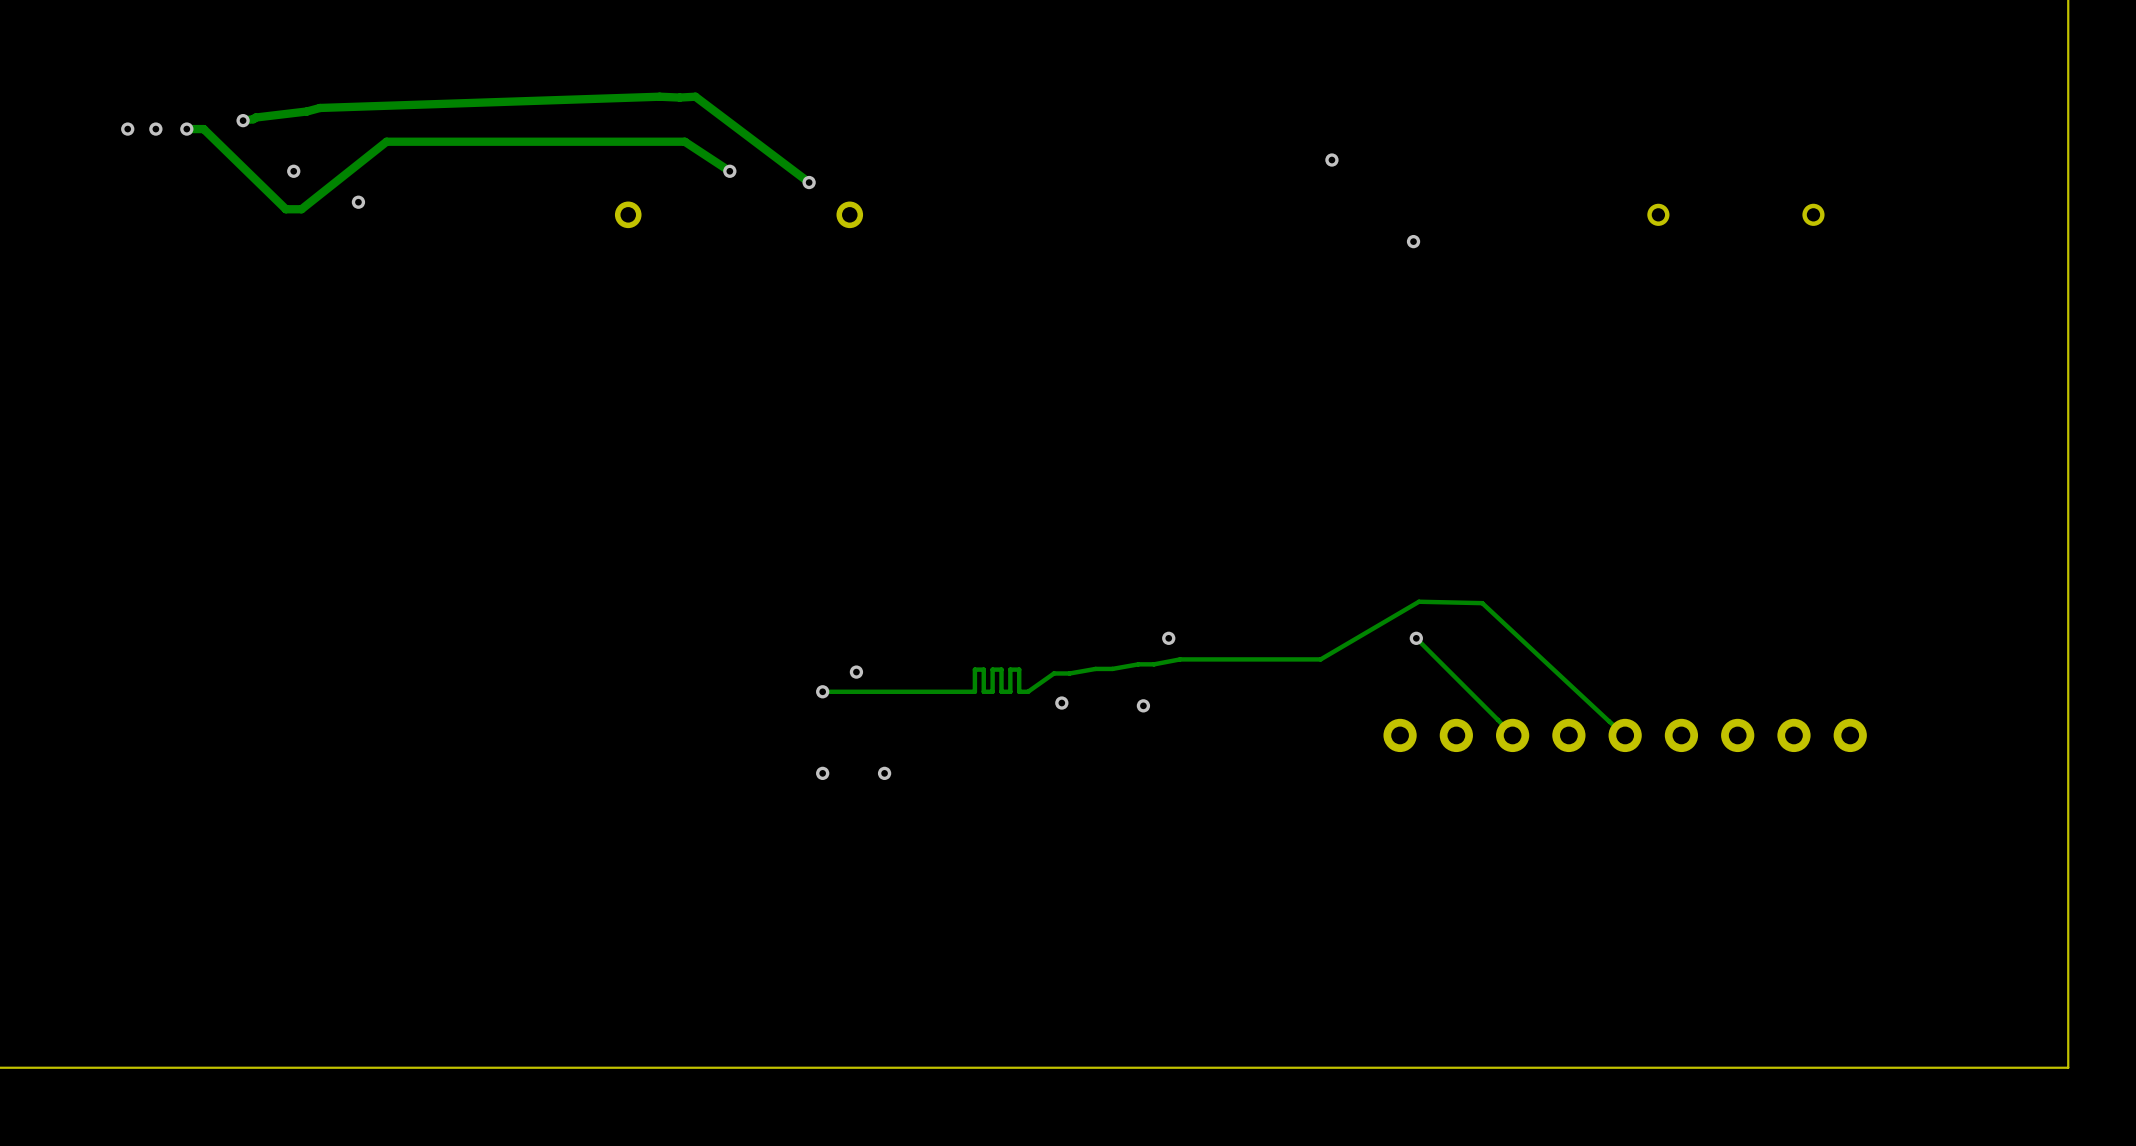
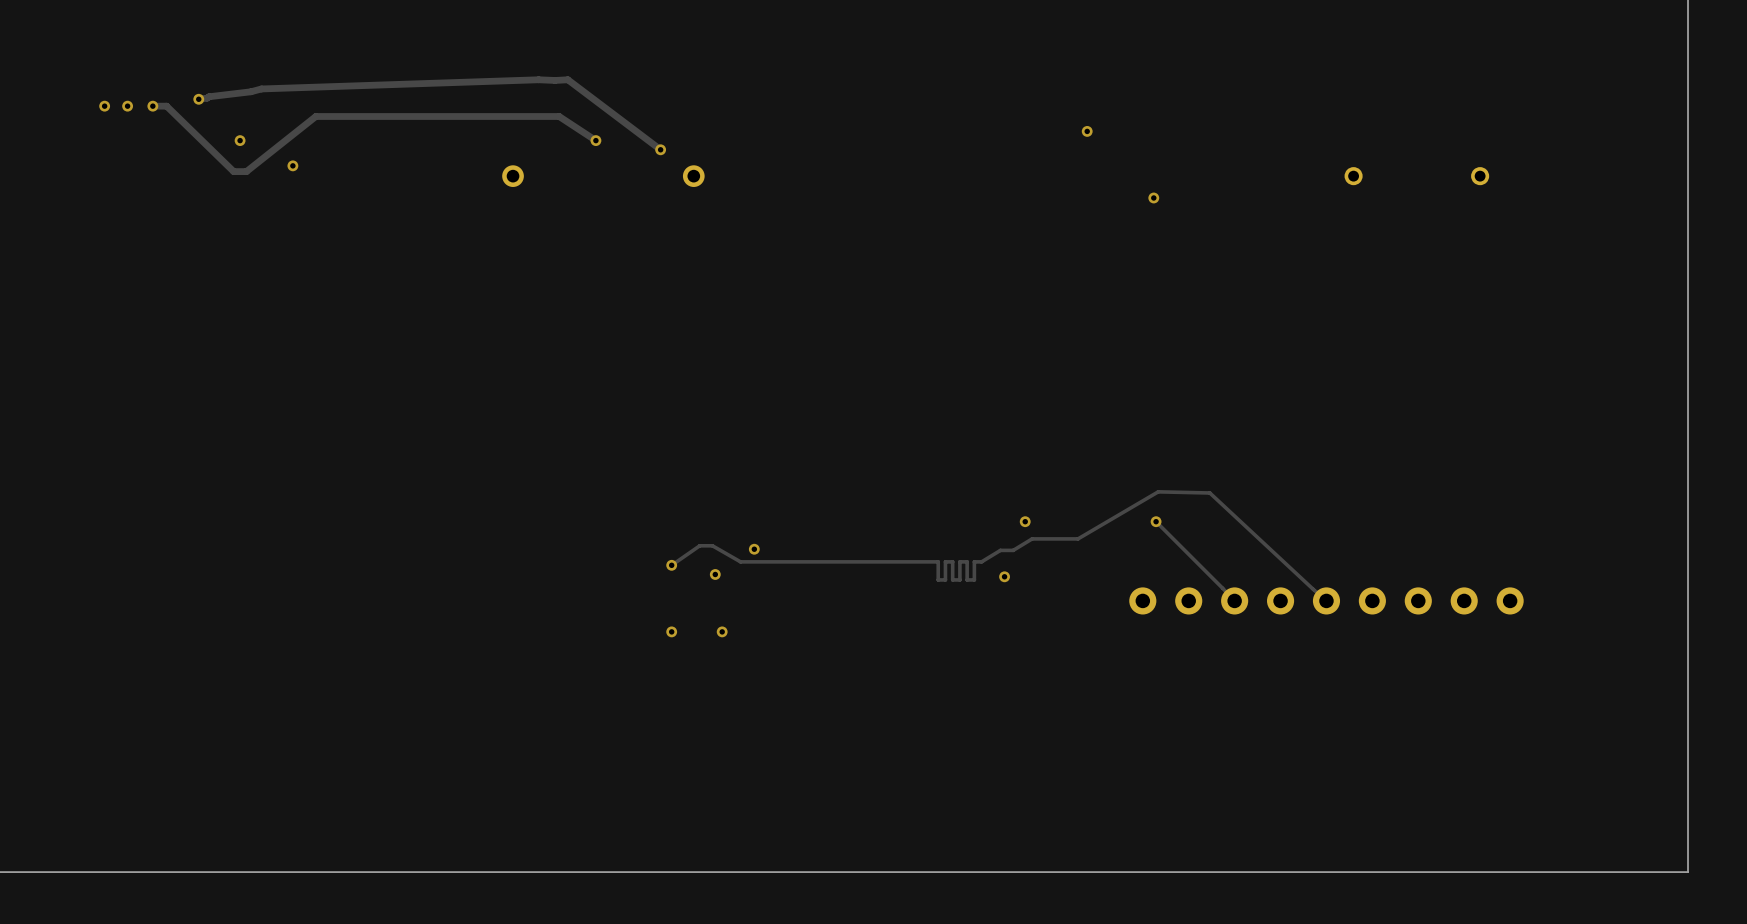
via: (1168, 638) -> none
via: none -> (1025, 521)
track: (1264, 659) (1180, 659) (1154, 664) (1053, 673) (1028, 691) (1019, 691) (1019, 669) (1010, 669) (1010, 691) (1001, 691) (1001, 669) (992, 669) (992, 691) (983, 691) (983, 669) (974, 669) (974, 691) (822, 691) -> (1032, 538) (1013, 550) (1000, 550) (981, 561) (974, 561) (974, 579) (967, 579) (967, 561) (959, 561) (959, 579) (952, 579) (952, 561) (945, 561) (945, 579) (938, 579) (938, 561) (740, 561) (712, 545) (699, 545) (671, 565)
via: (856, 672) -> none
via: none -> (754, 549)
via: none -> (715, 574)
via: (1061, 703) -> none
via: (1143, 705) -> none
via: none -> (1004, 576)

